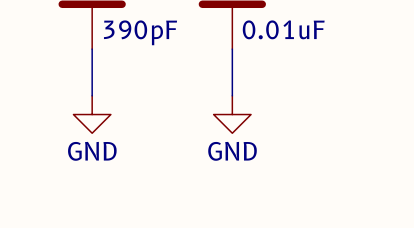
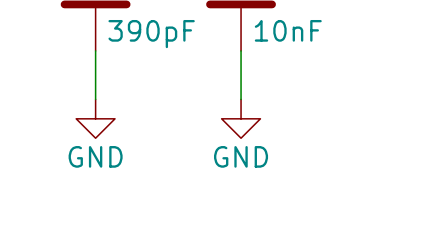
part value: 0.01uF (283, 29) -> 10nF (288, 30)

